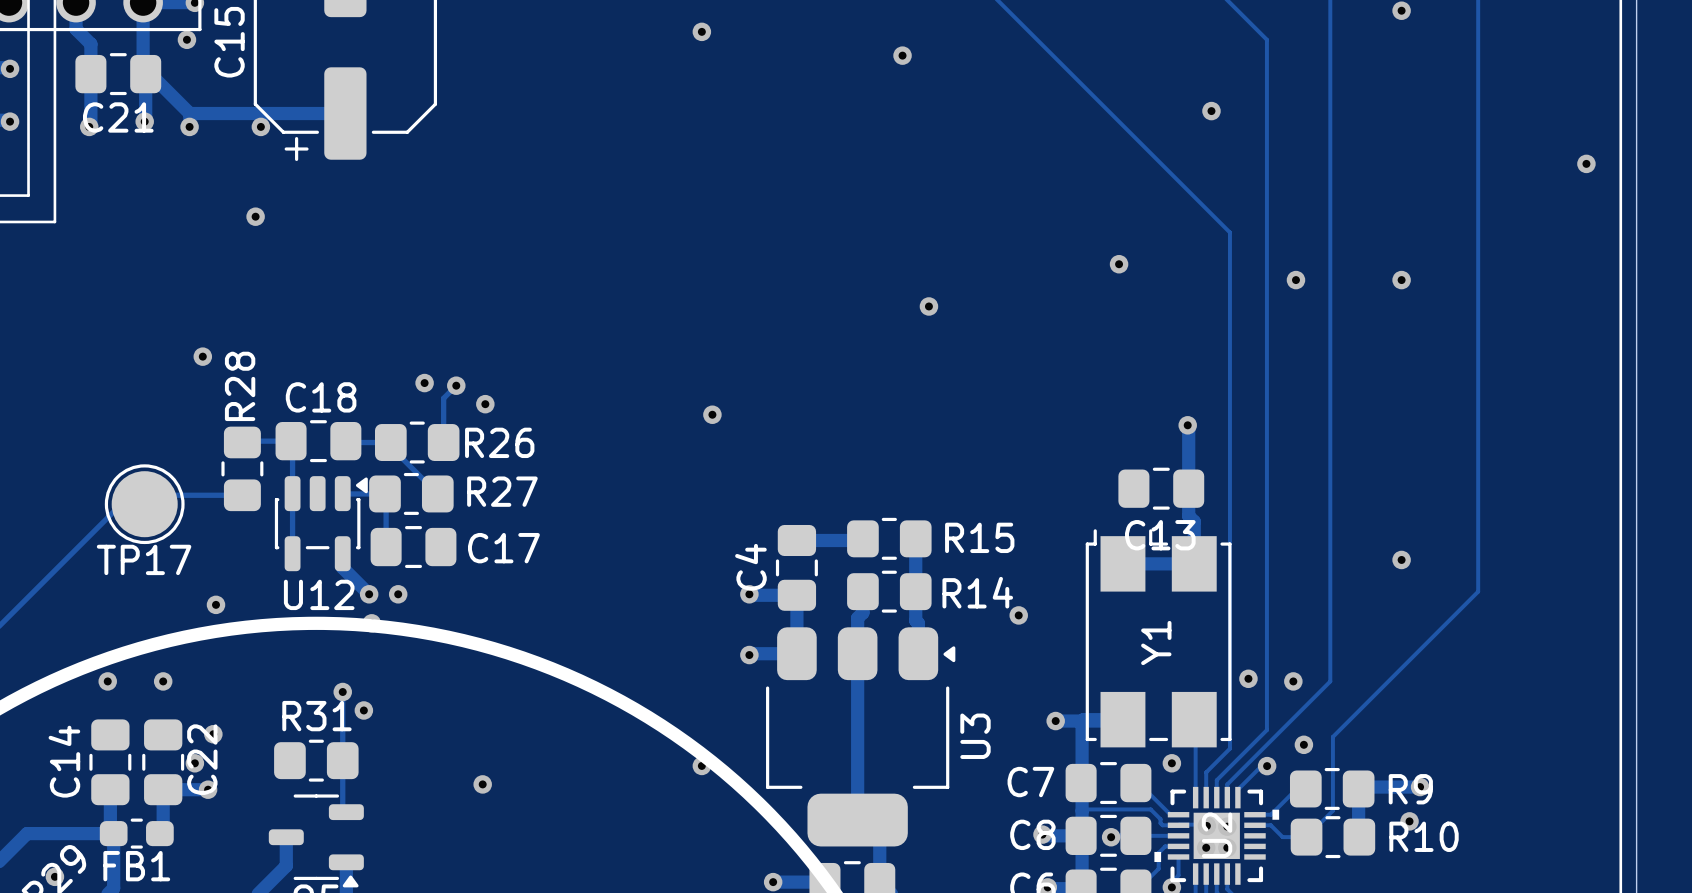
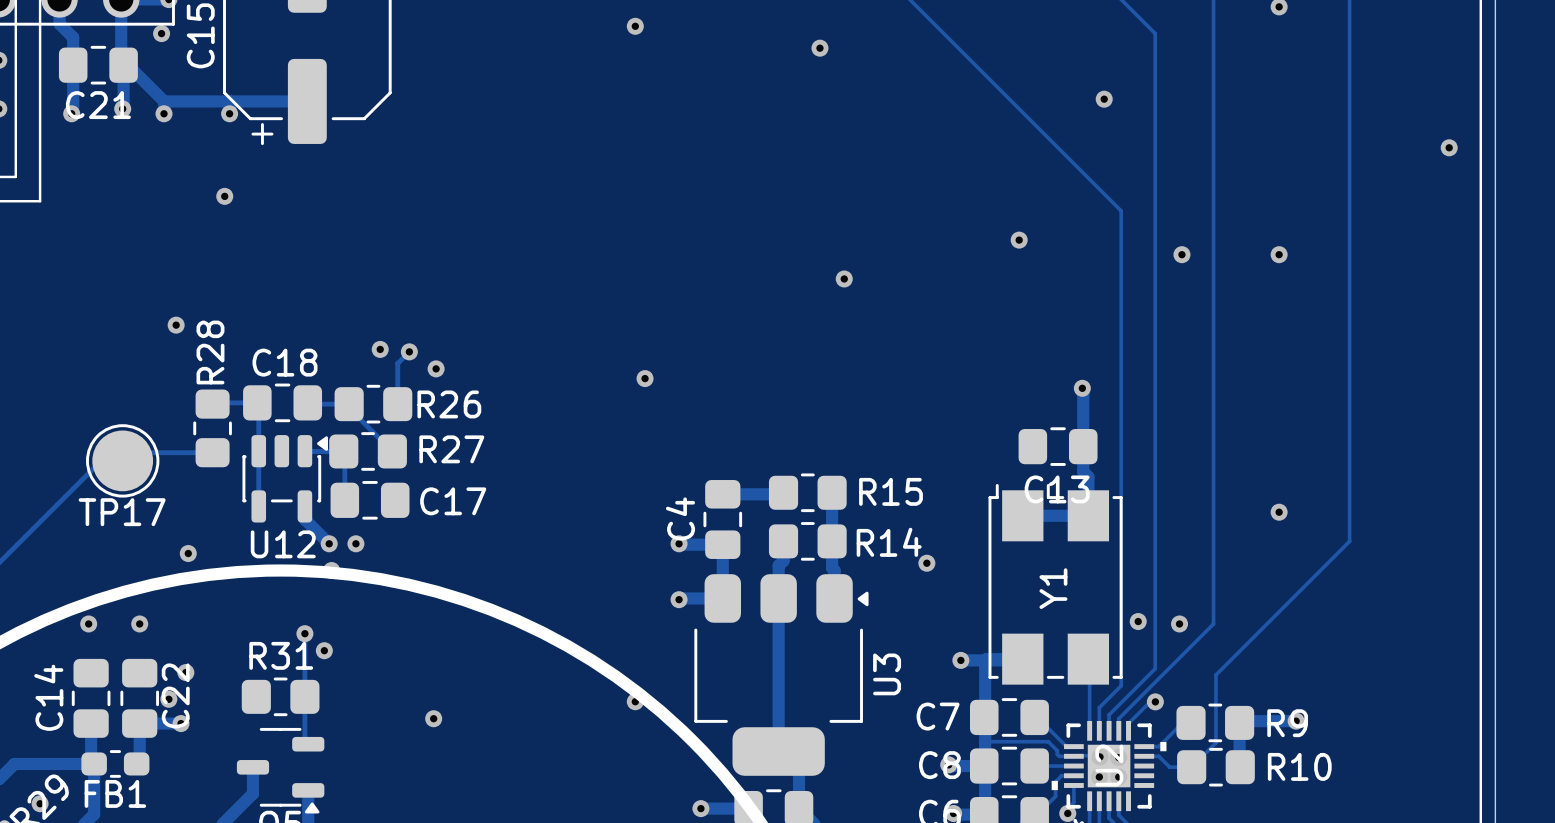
via: (1303, 744) -> none
via: (1171, 763) -> none
via: (1409, 821) -> none
via: (1111, 837) -> none

